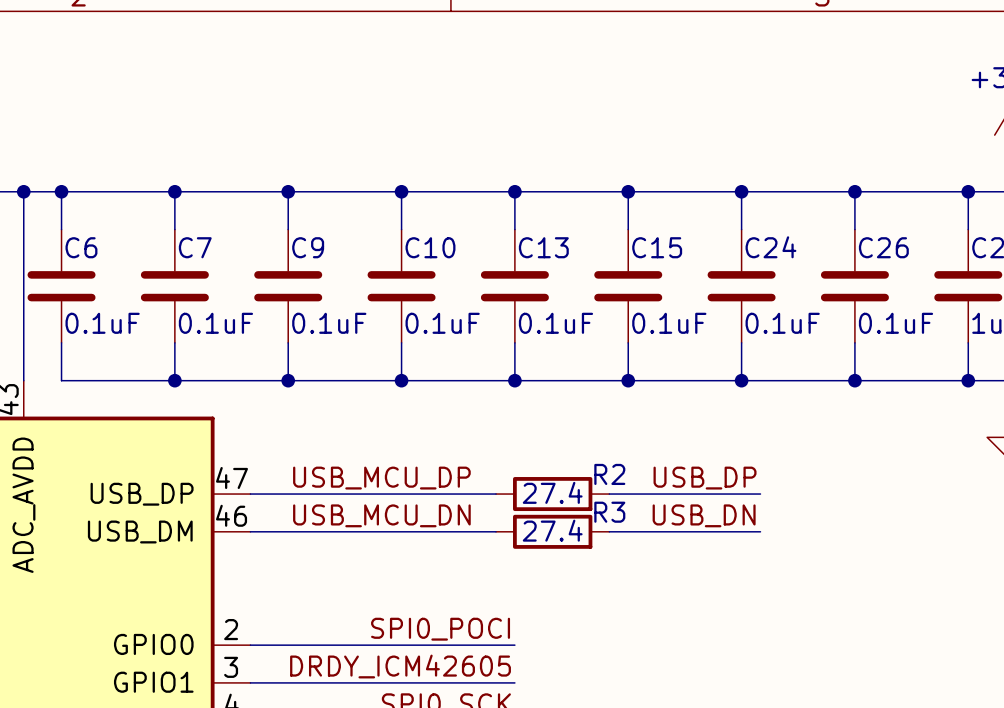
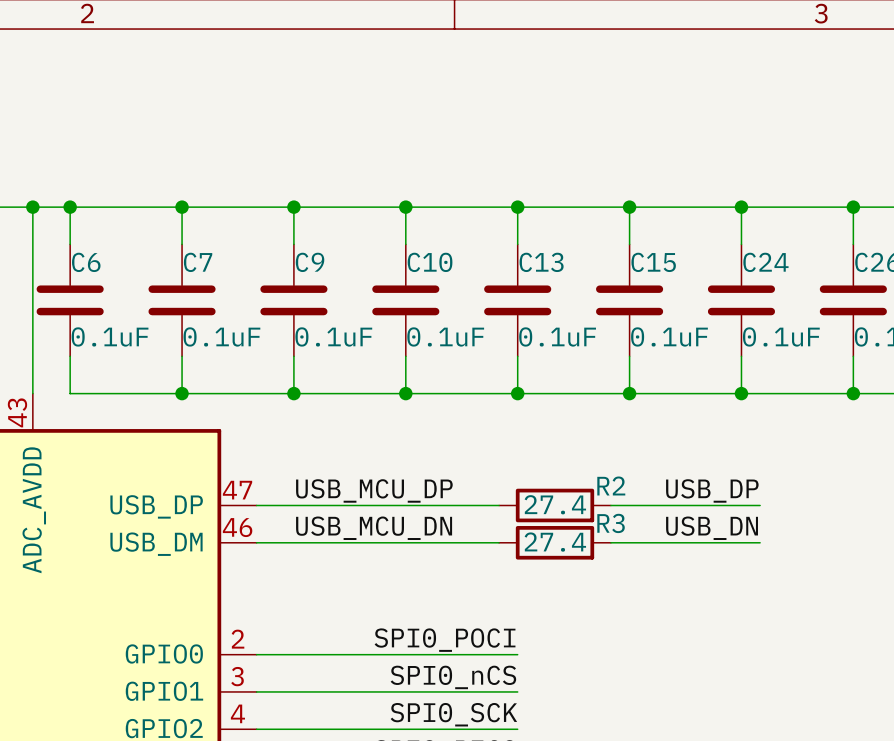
label: DRDY_ICM42605 (400, 666) -> SPI0_nCS (453, 677)

